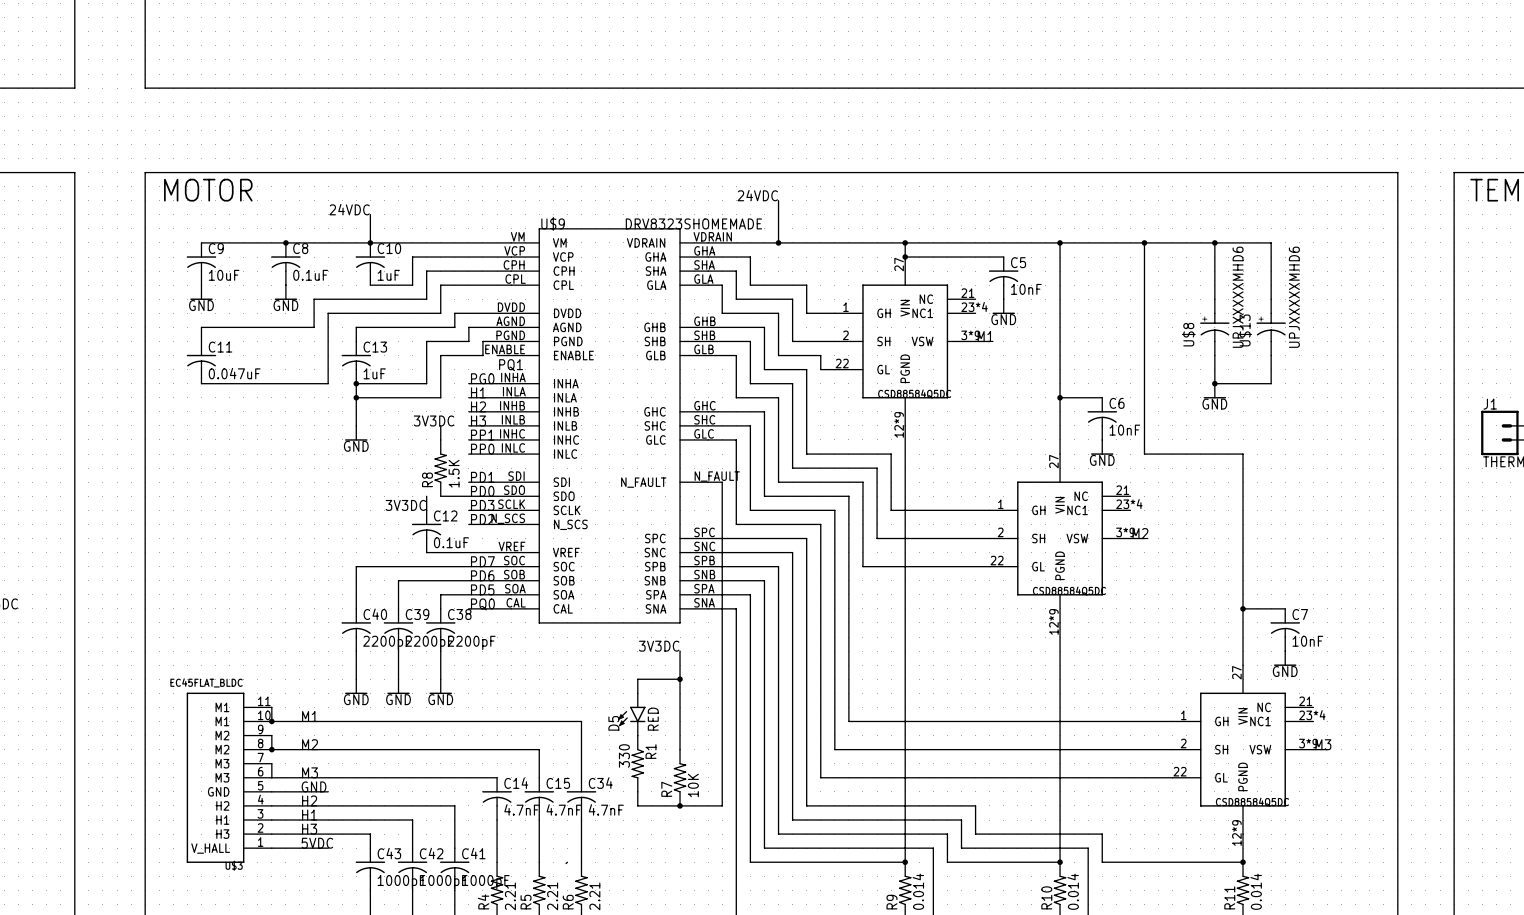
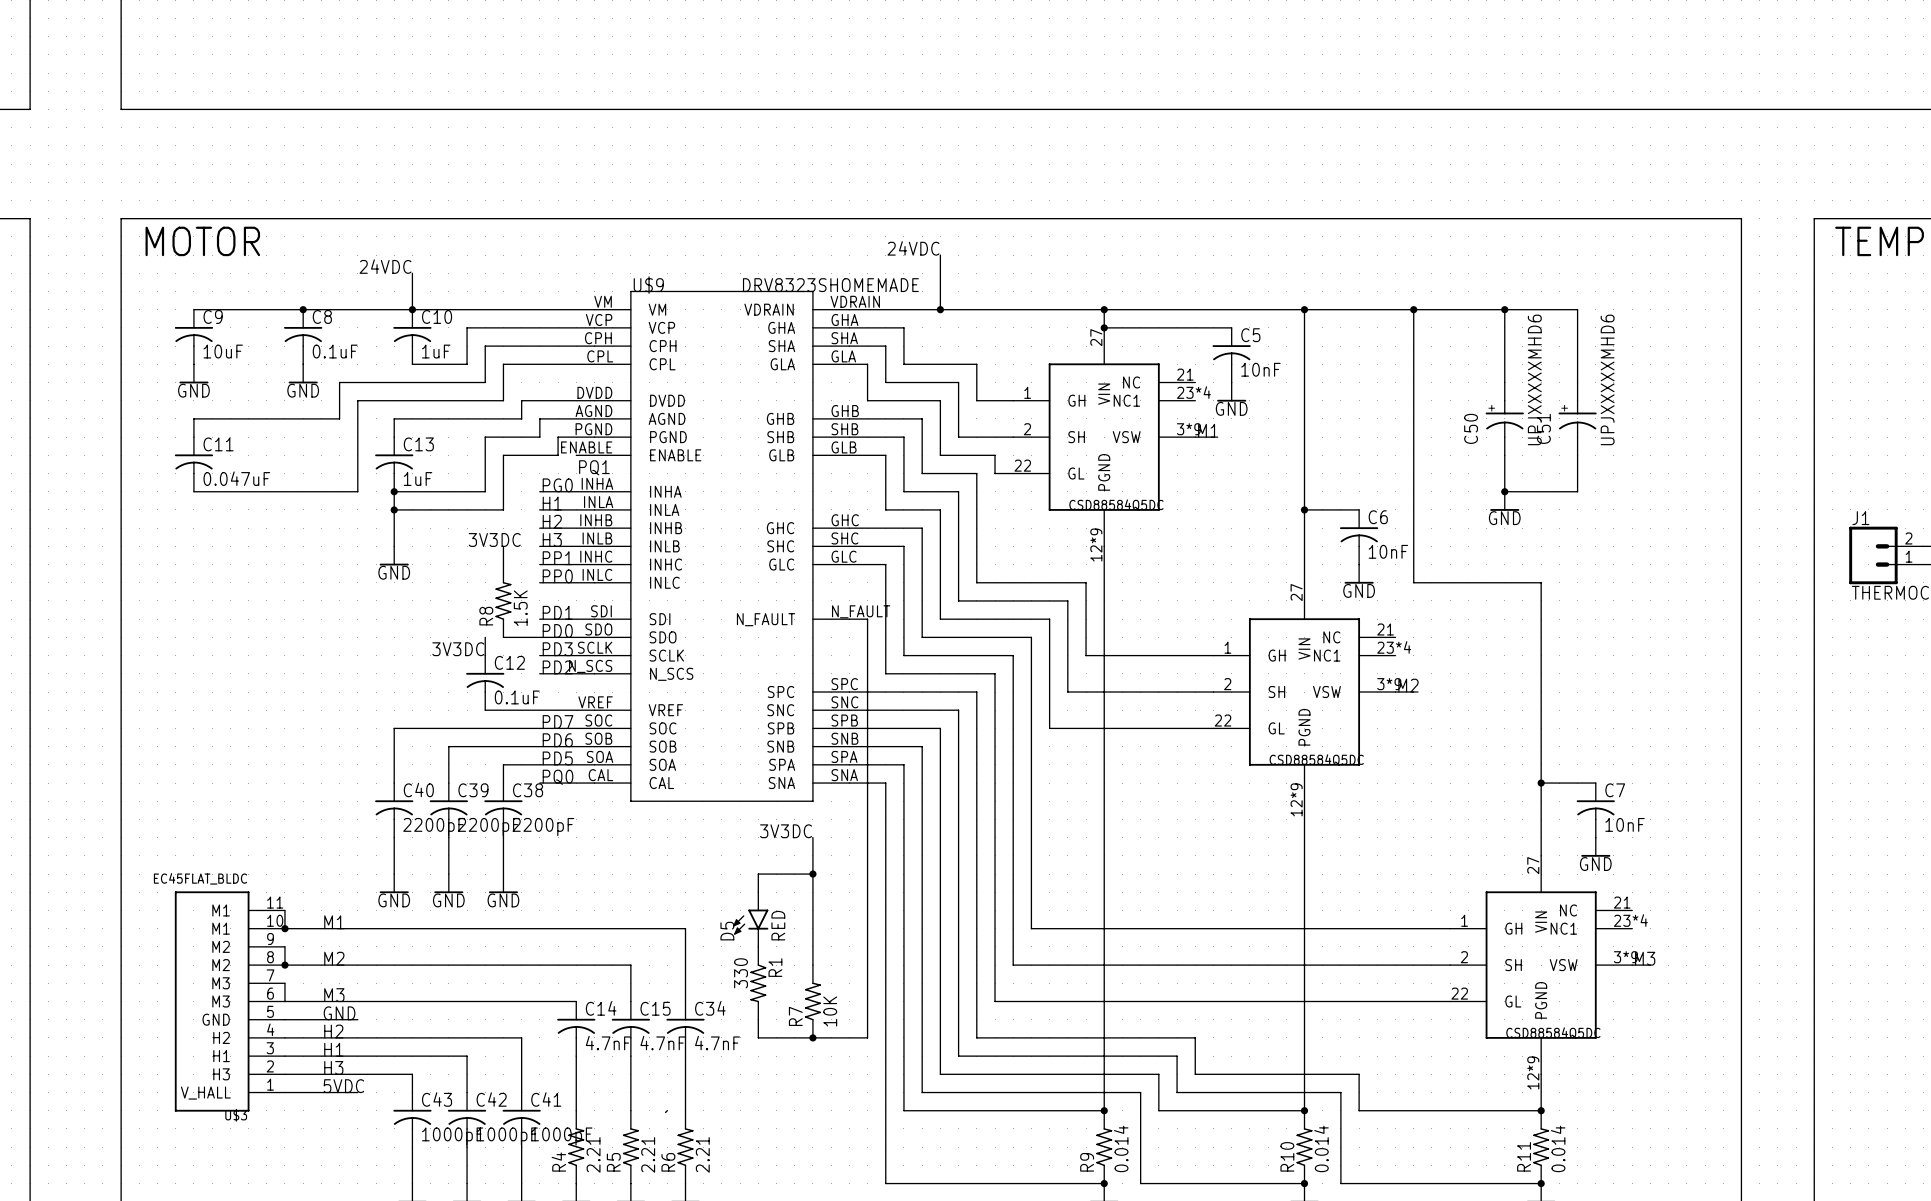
U$13 name: U$13 (1245, 330) -> C51 (1543, 428)
U$8 name: U$8 (1188, 334) -> C50 (1471, 428)

